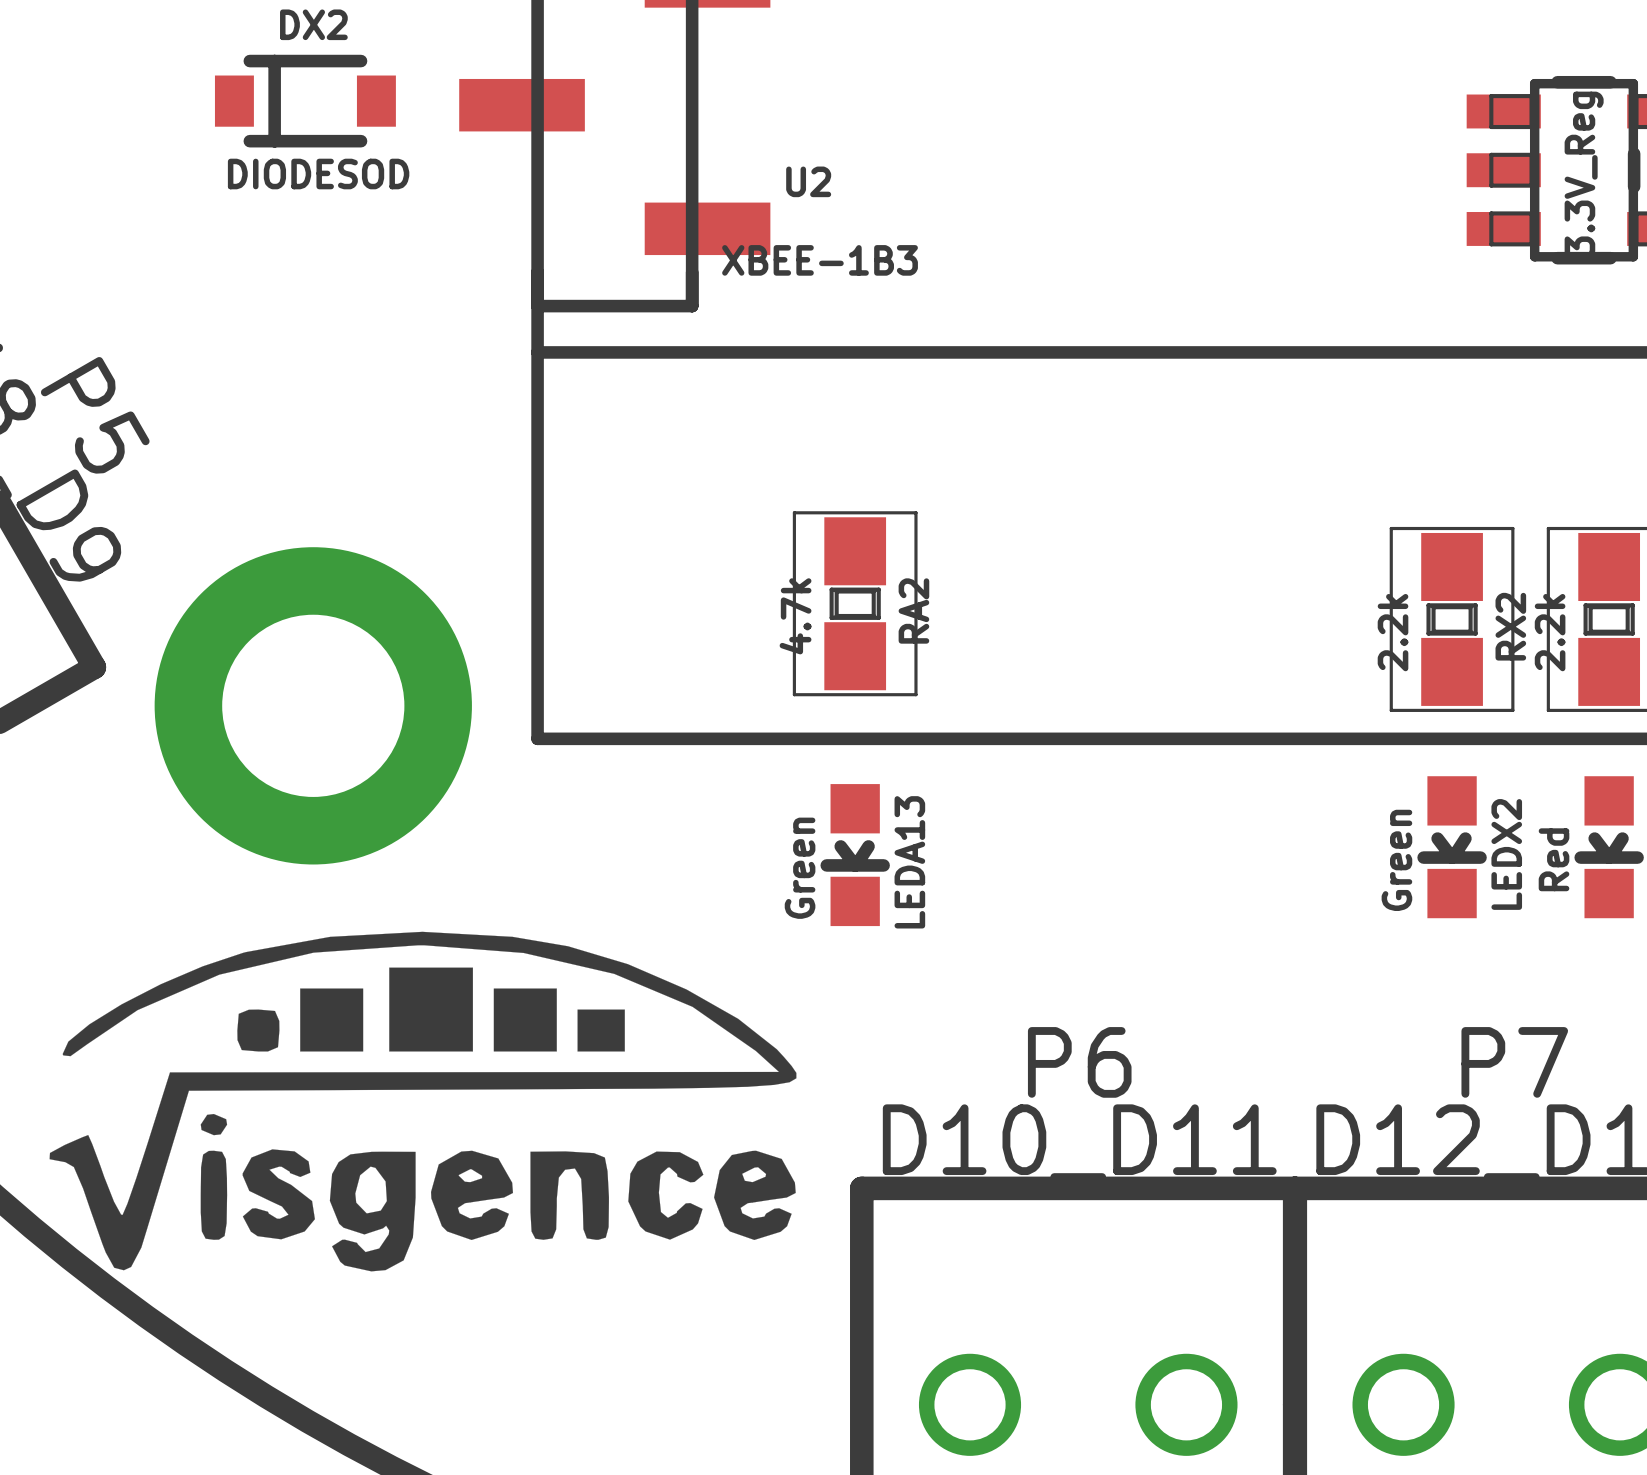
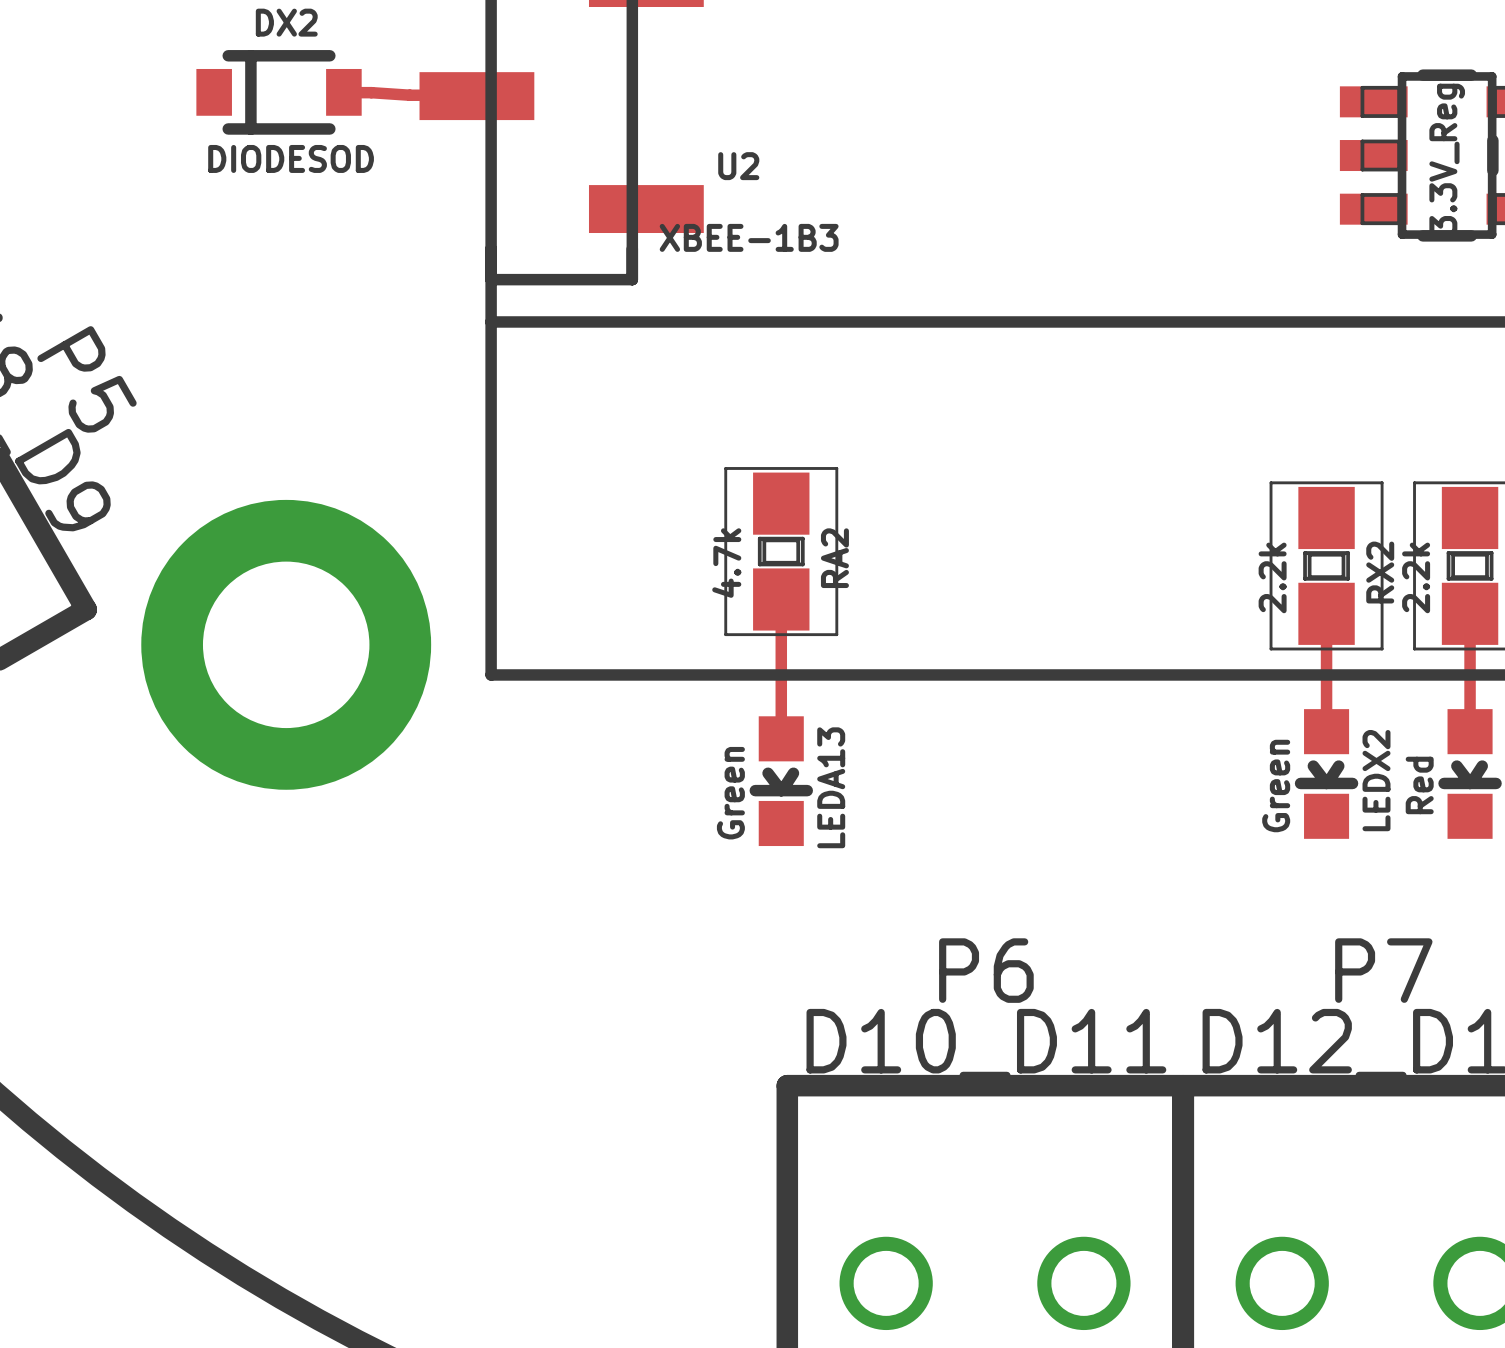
top track: none -> (343, 92) (476, 96)
top track: none -> (781, 599) (781, 738)
top track: none -> (1326, 613) (1326, 731)
top track: none -> (1470, 613) (1470, 731)
drawing: [49, 931, 797, 1272] -> none

